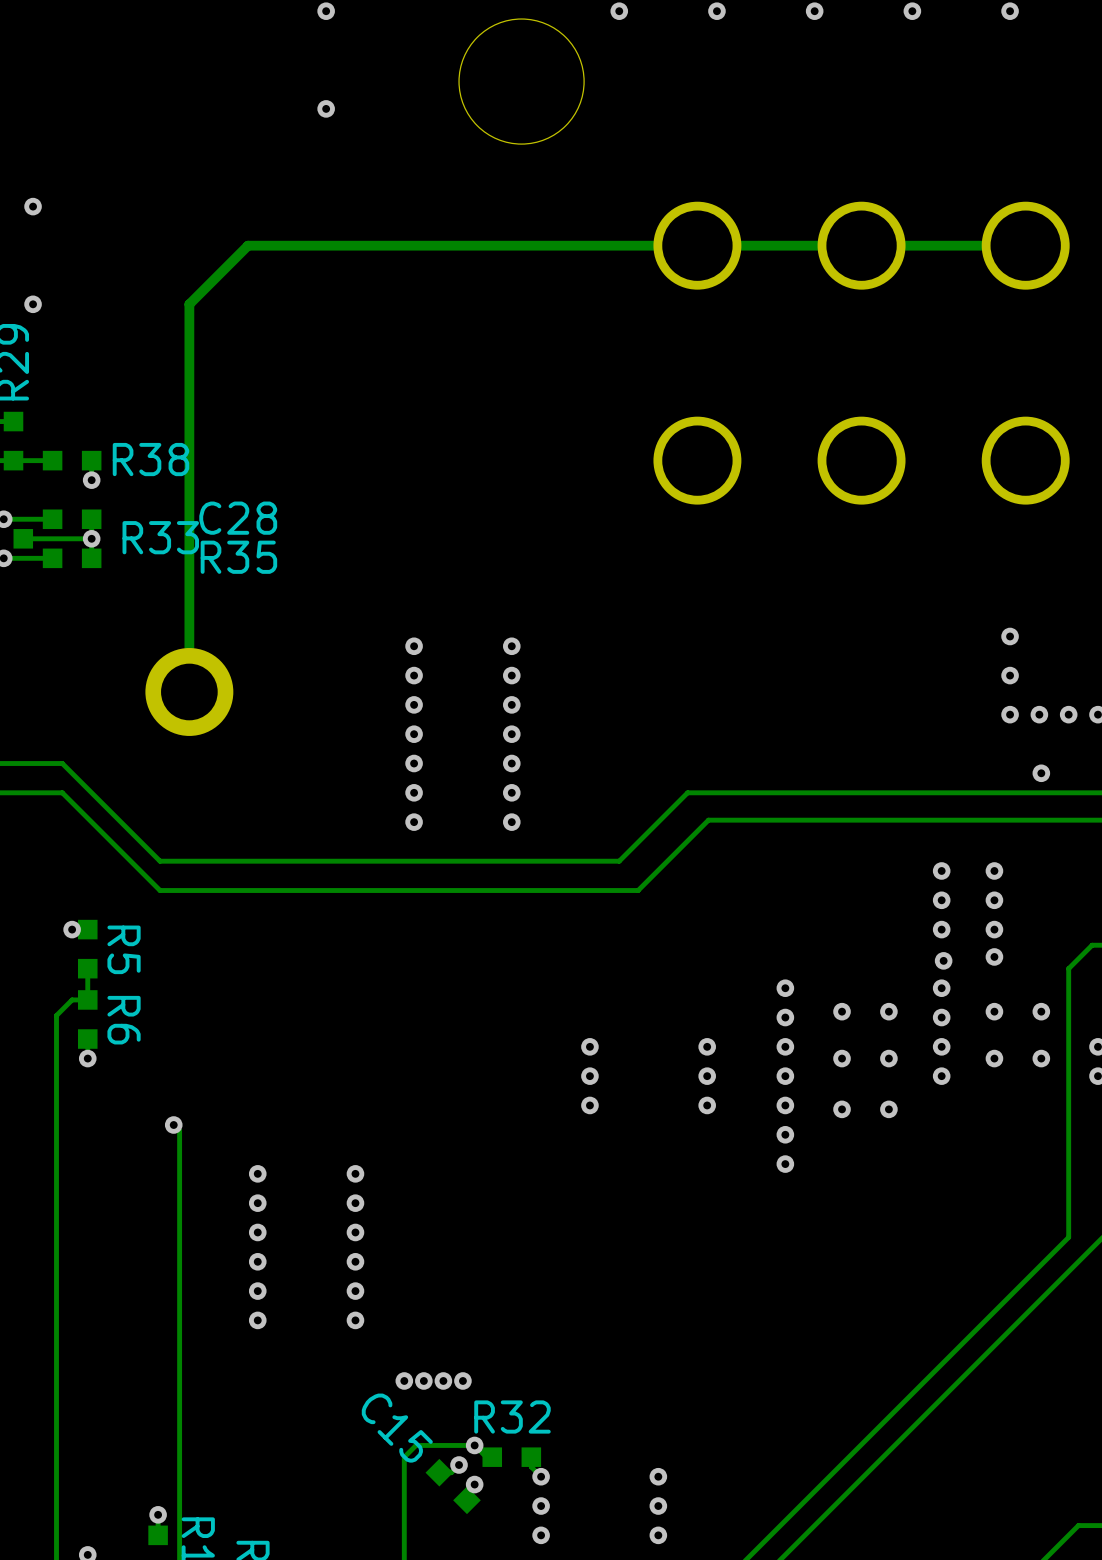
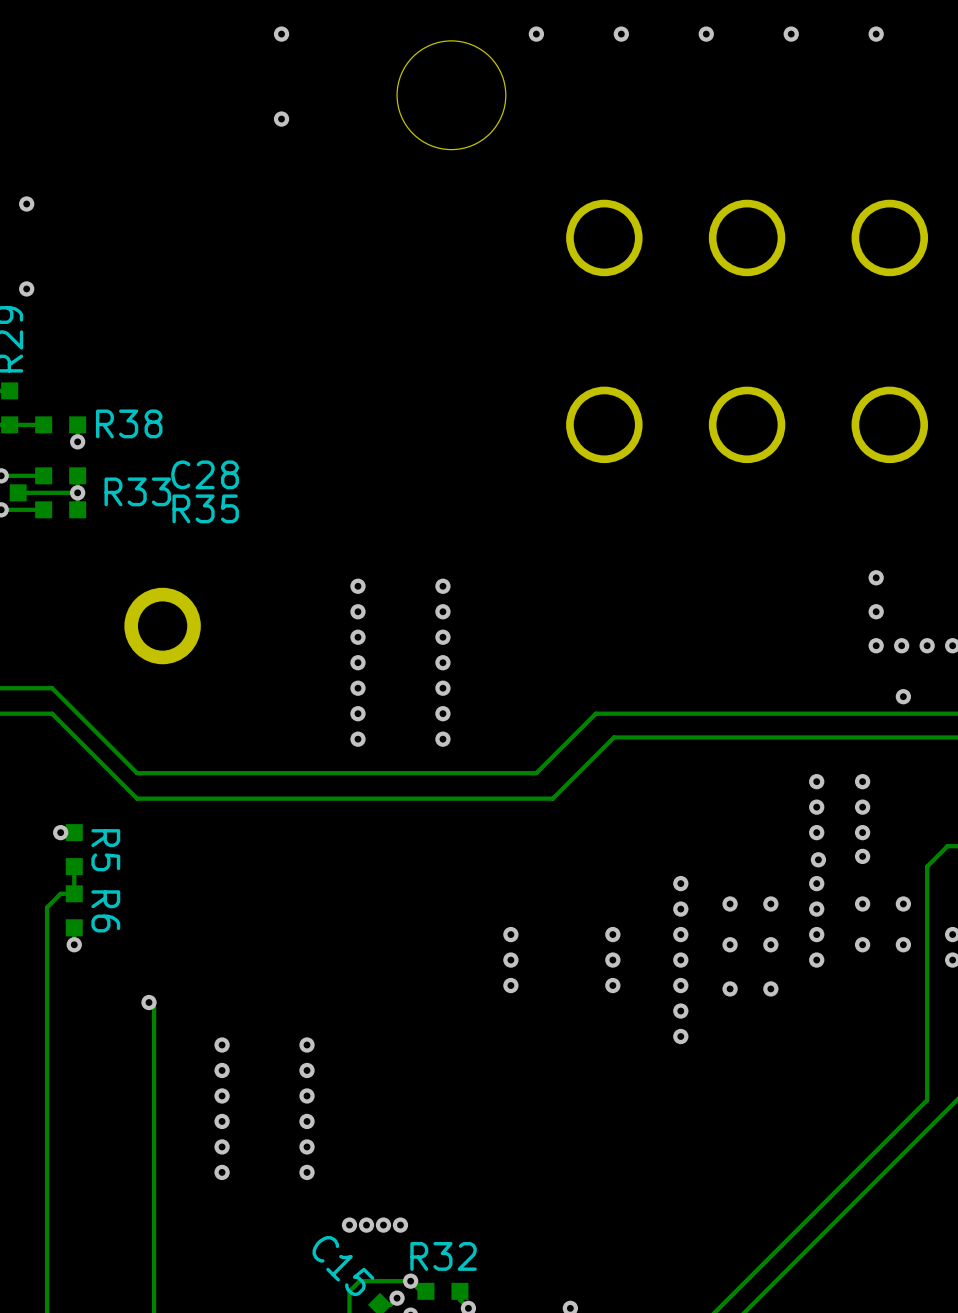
track: (1025, 245) (247, 245) (189, 304) (189, 691) -> none

